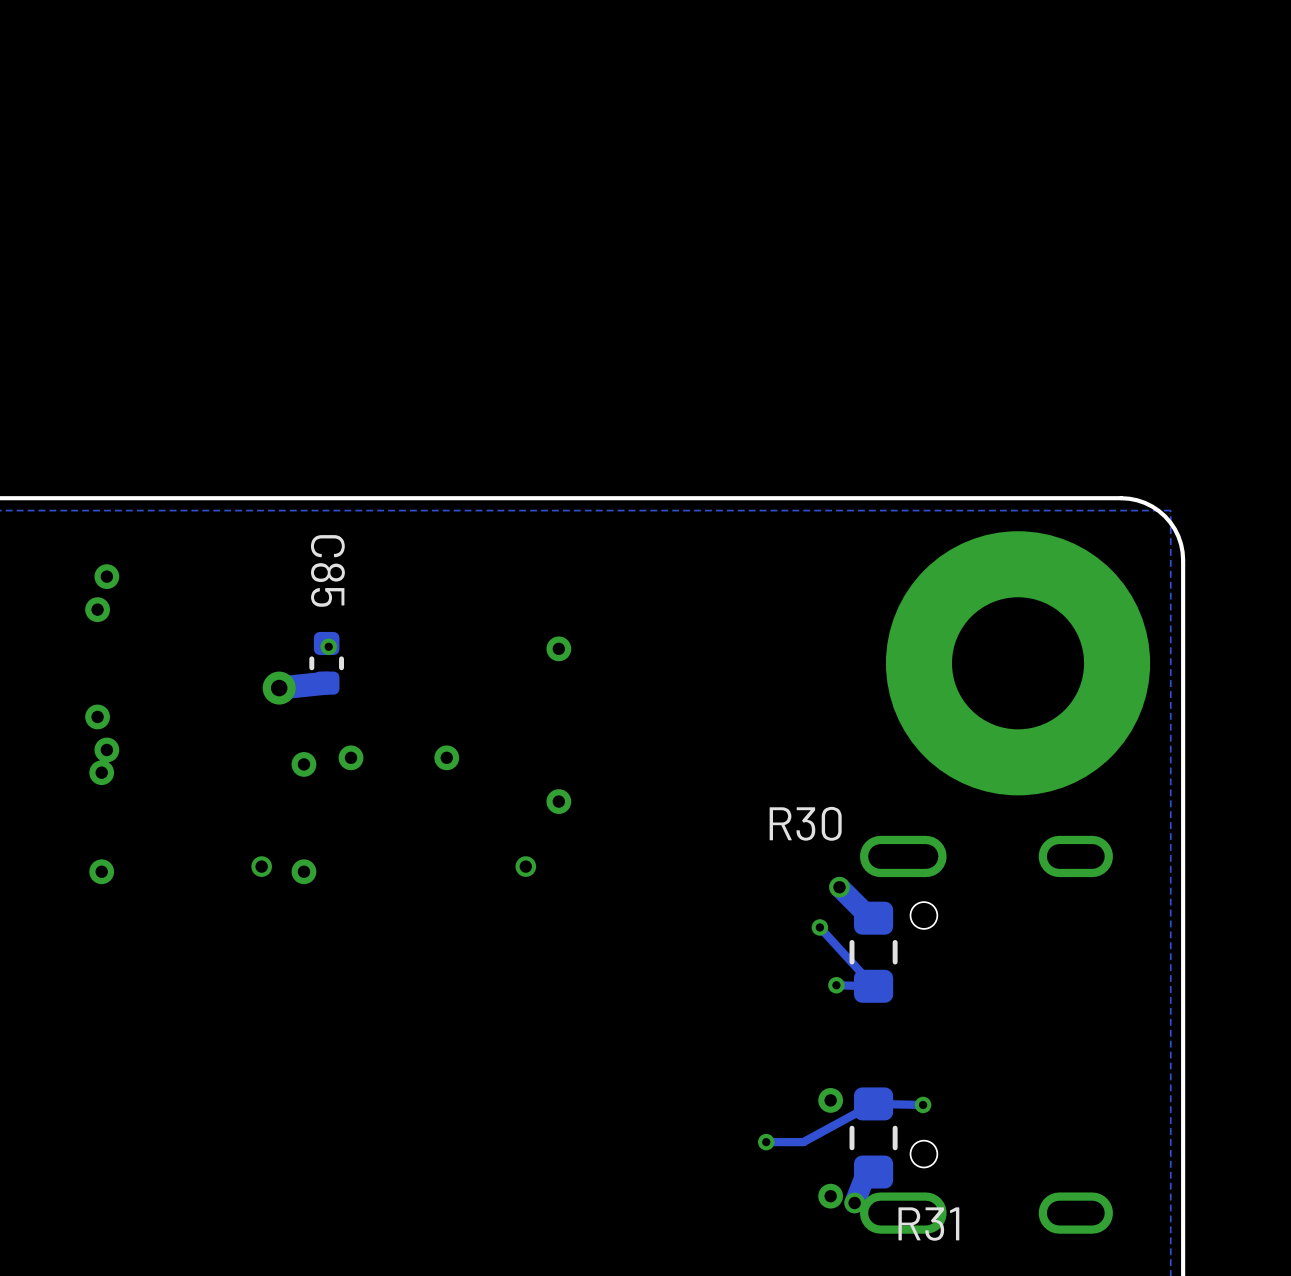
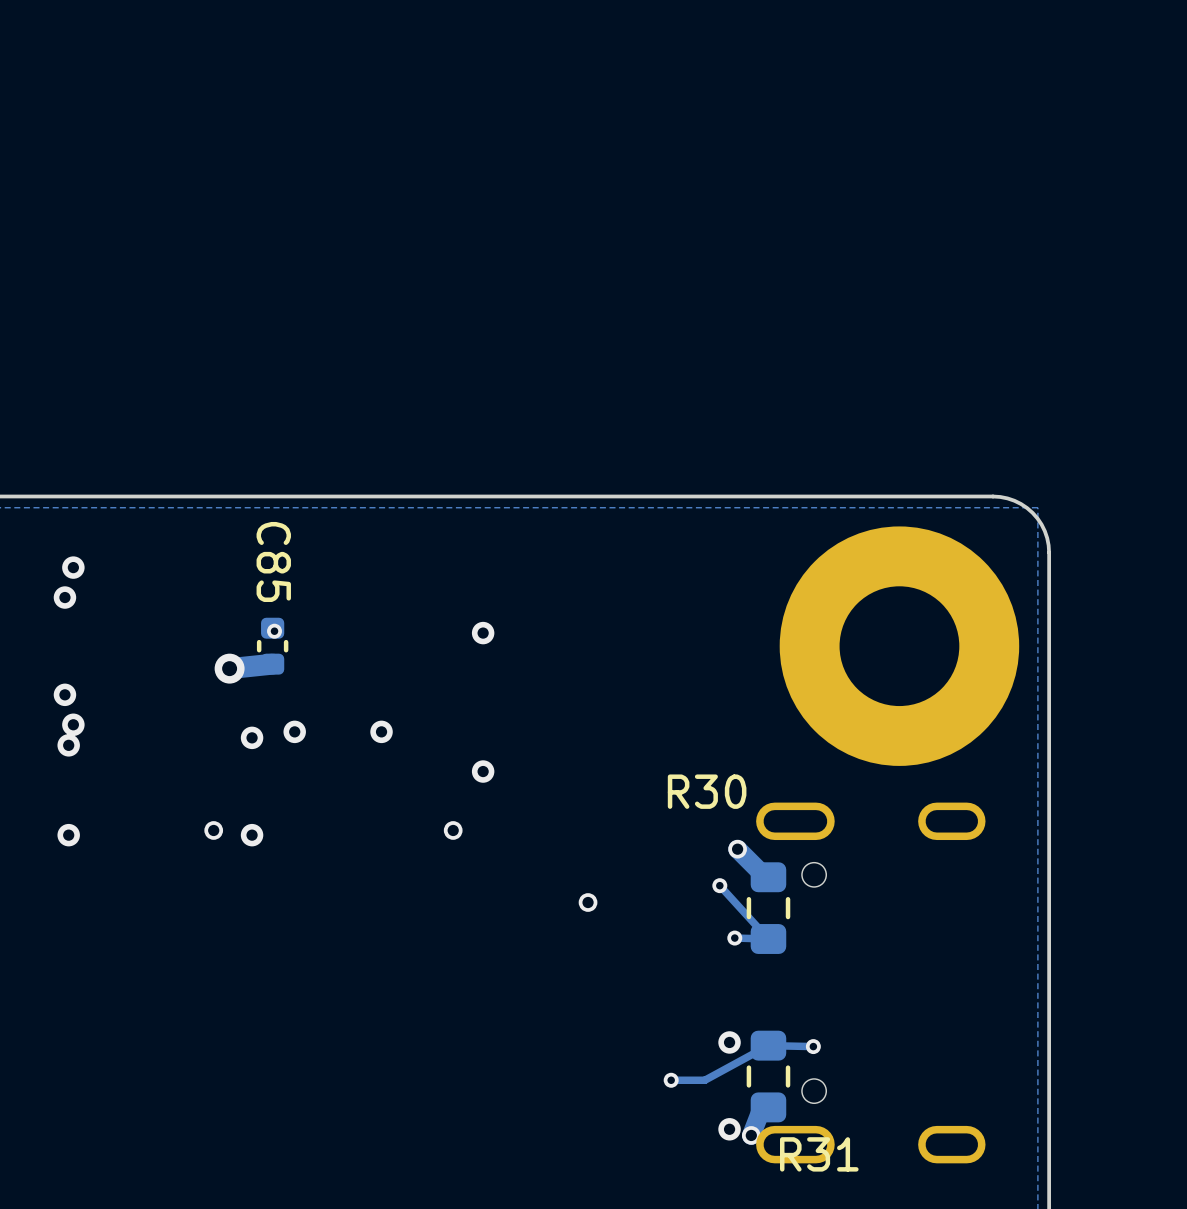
via: none -> (588, 902)

